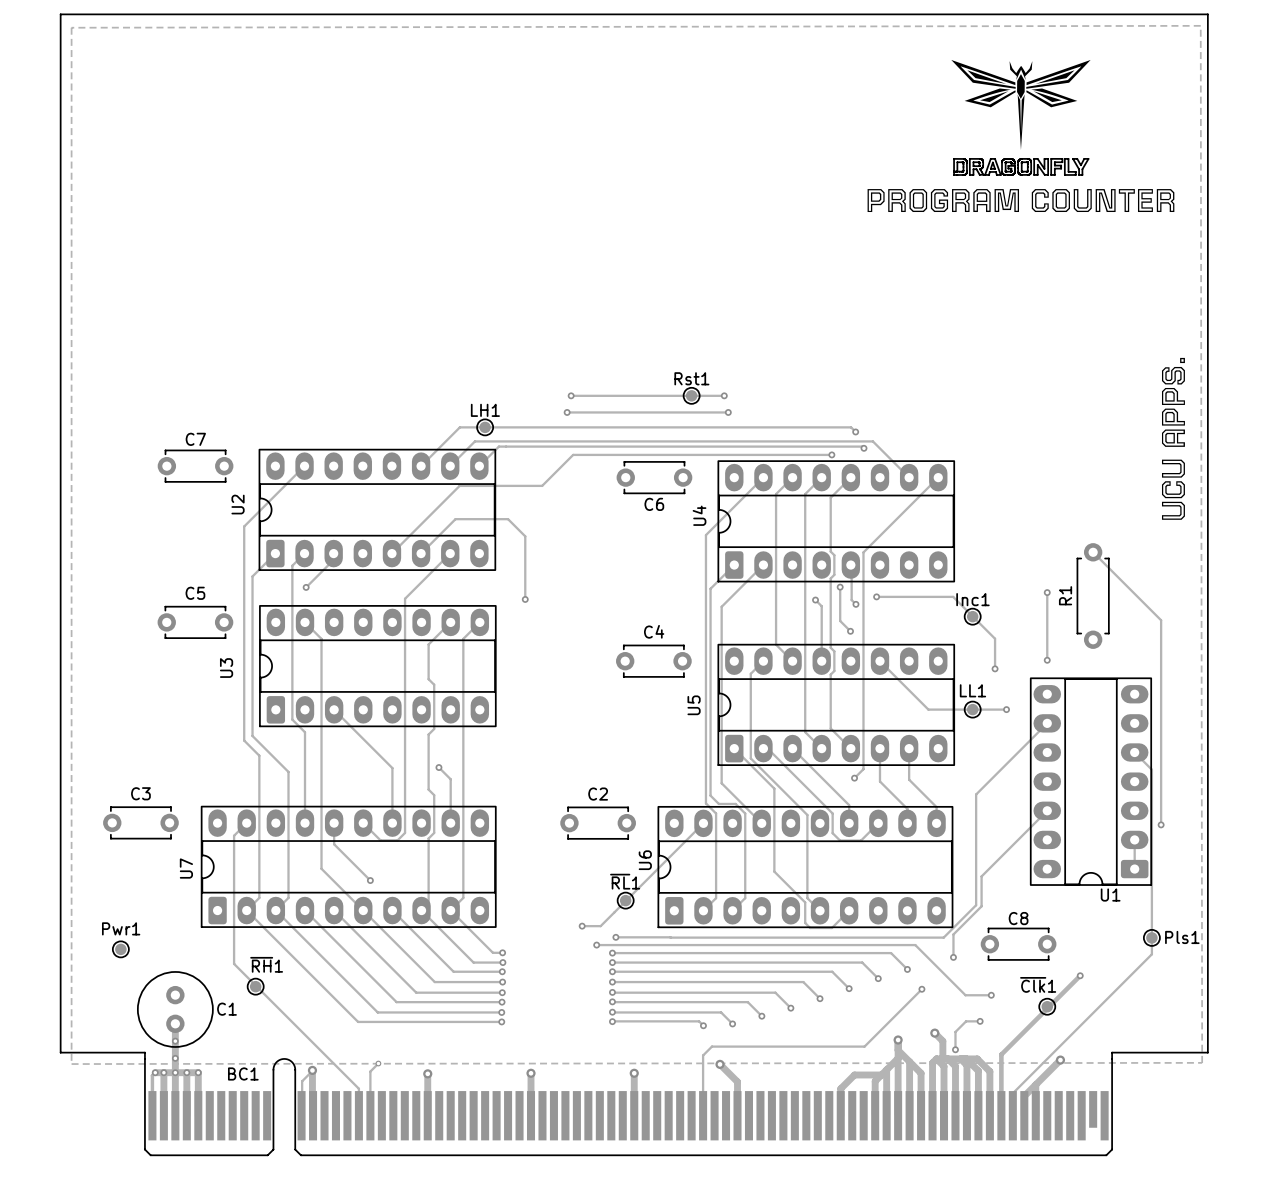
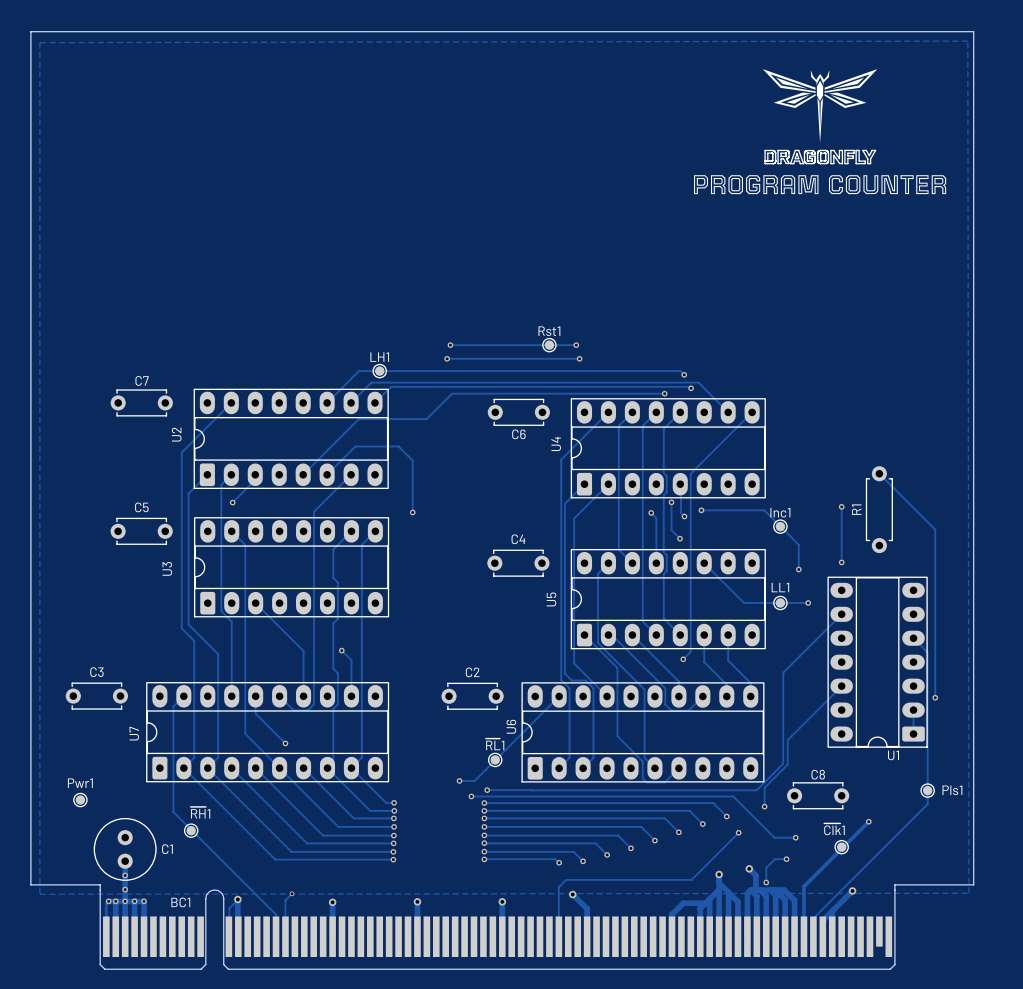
drawing: [1161, 357, 1185, 520] -> none

